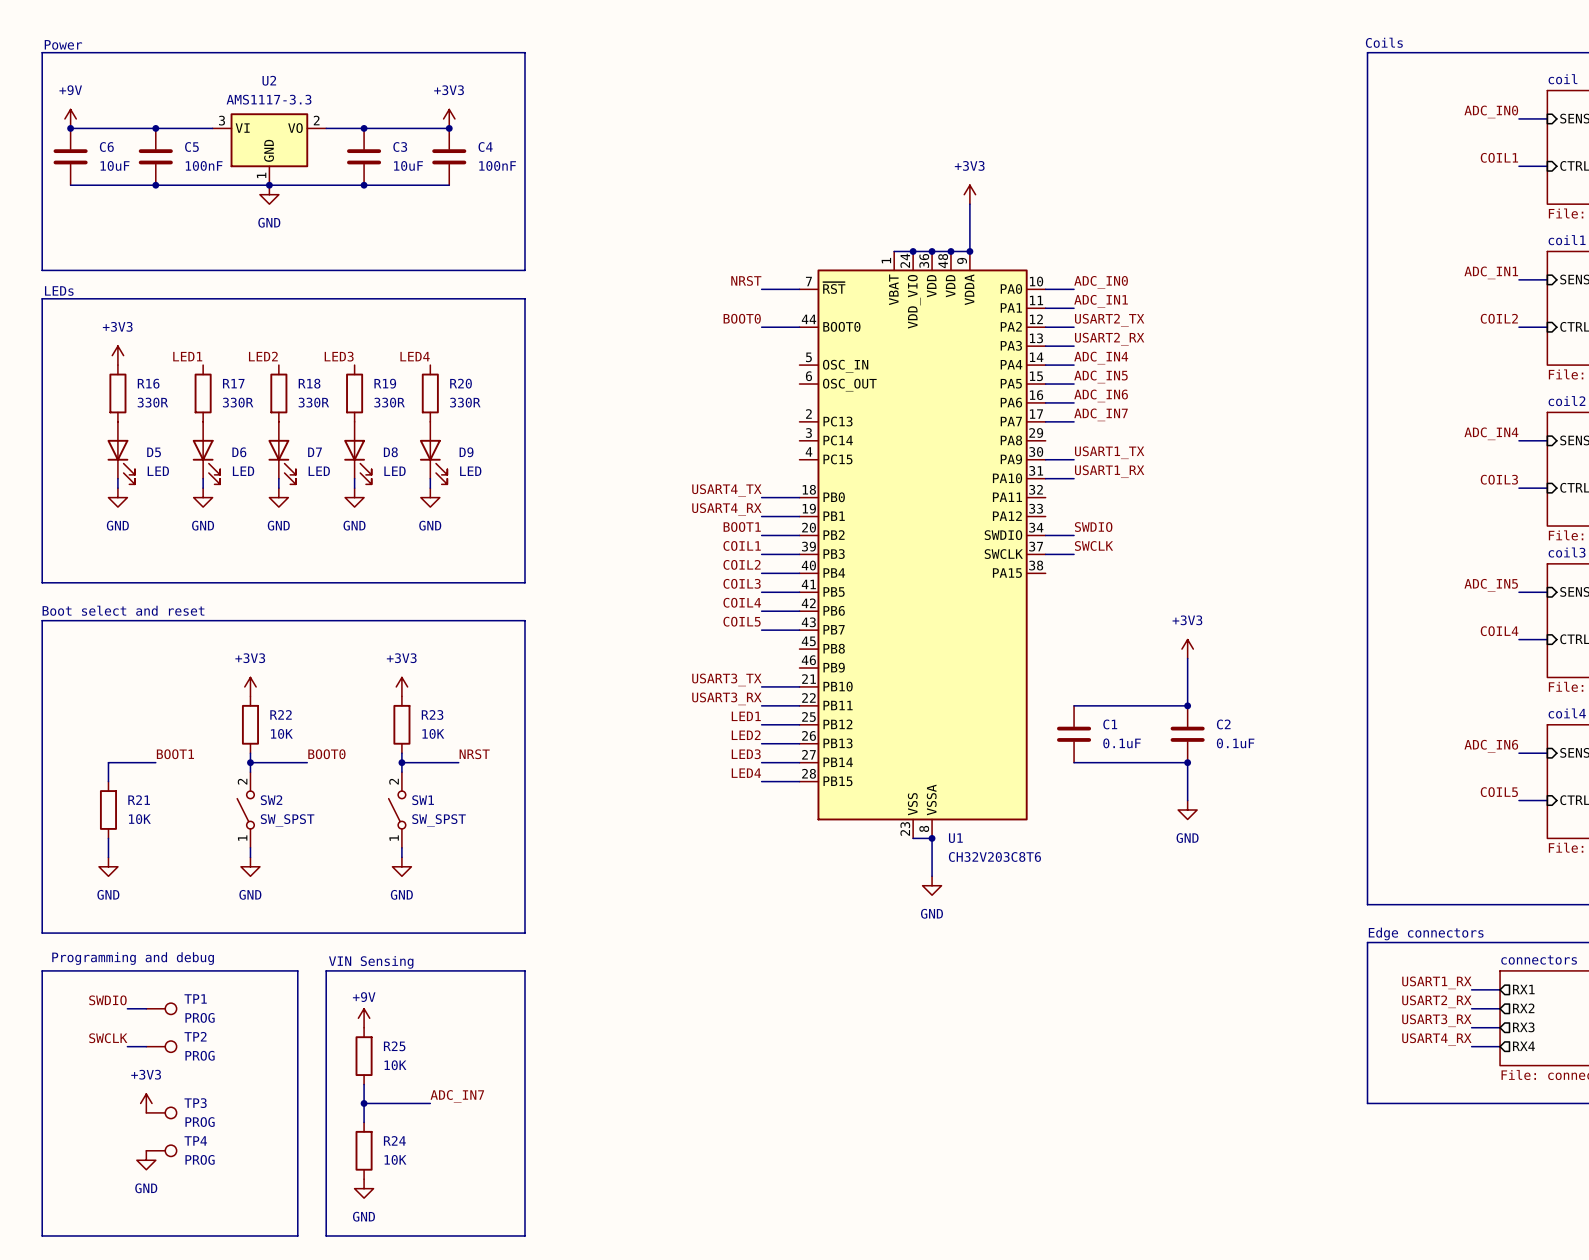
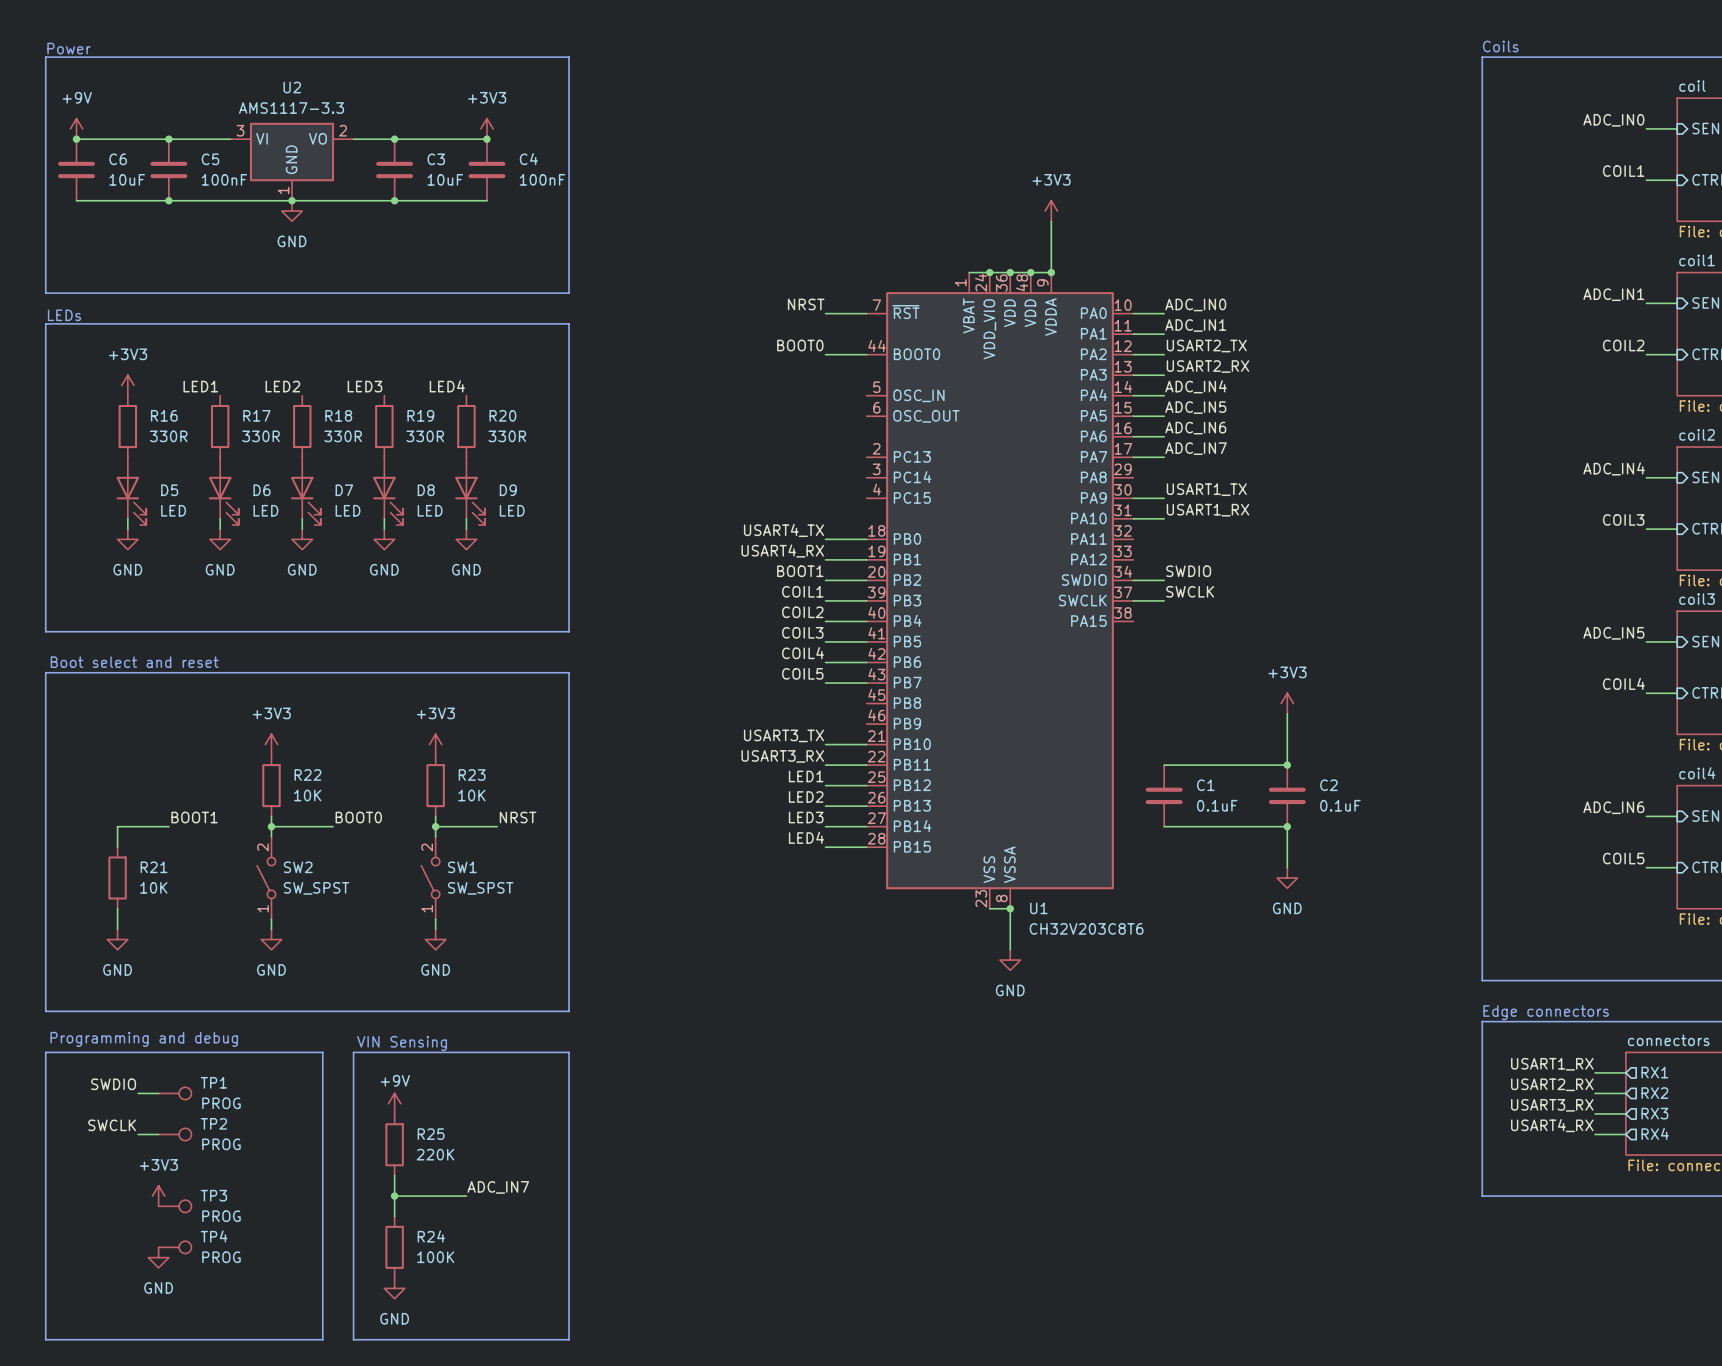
R25 value: 10K (395, 1065) -> 220K (435, 1154)
R24 value: 10K (395, 1159) -> 100K (435, 1257)

